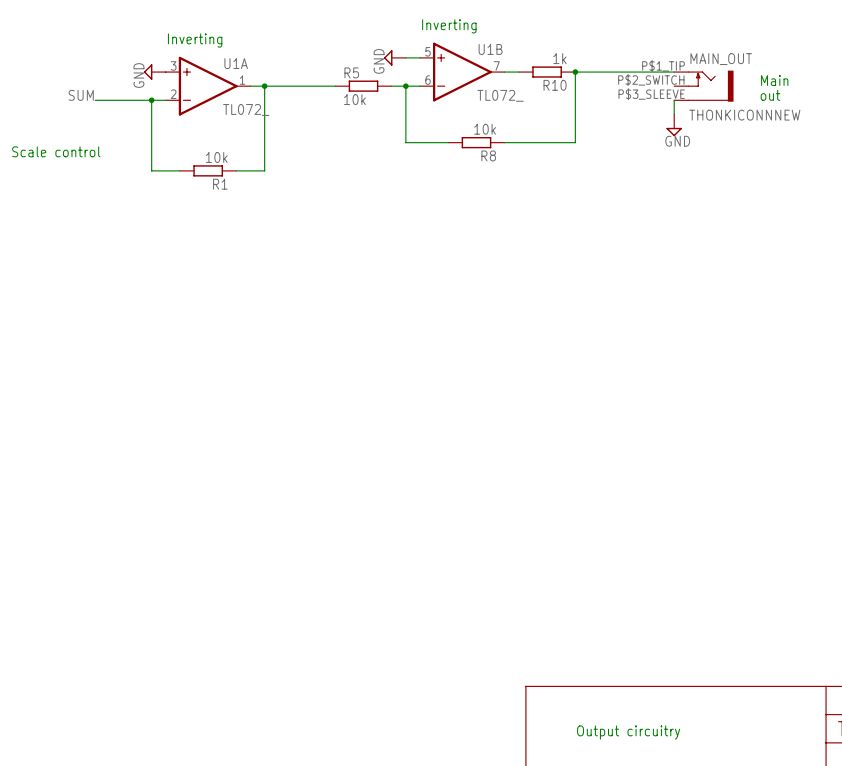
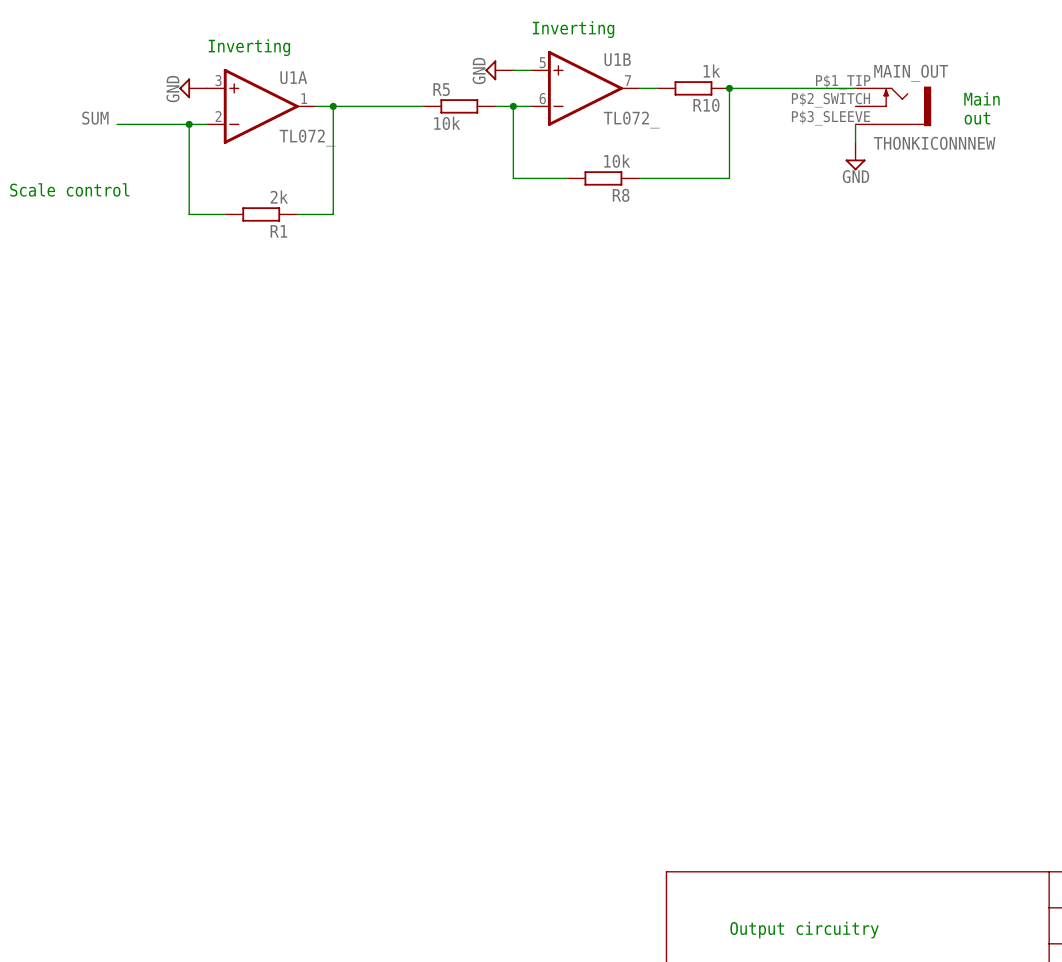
R1 value: 10k (216, 157) -> 2k (279, 197)

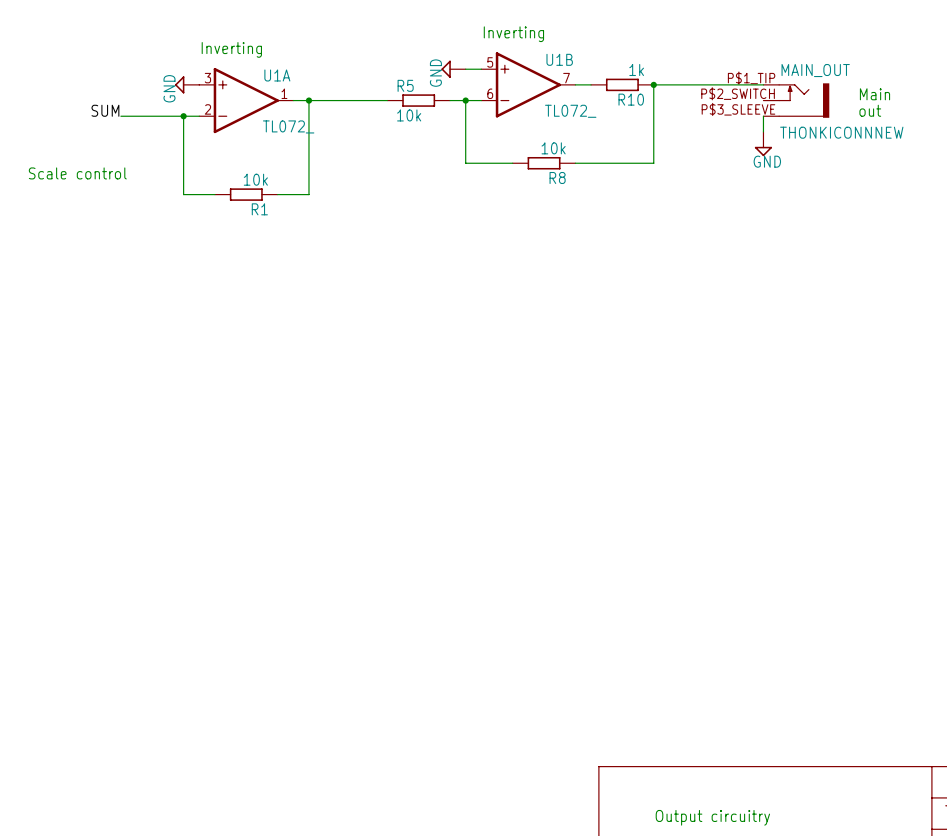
R1 value: 2k (279, 197) -> 10k (255, 179)

